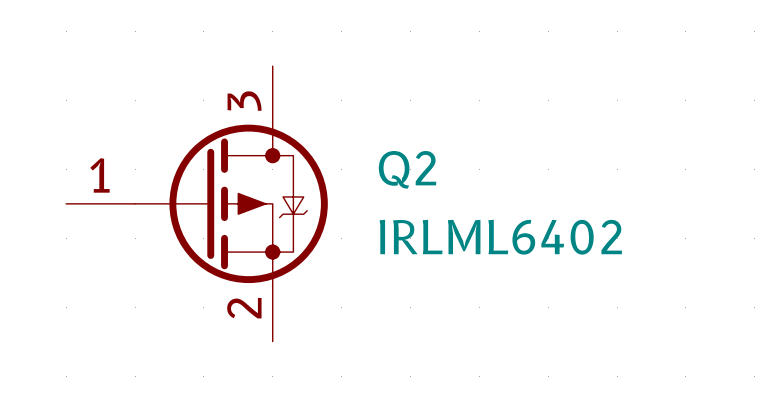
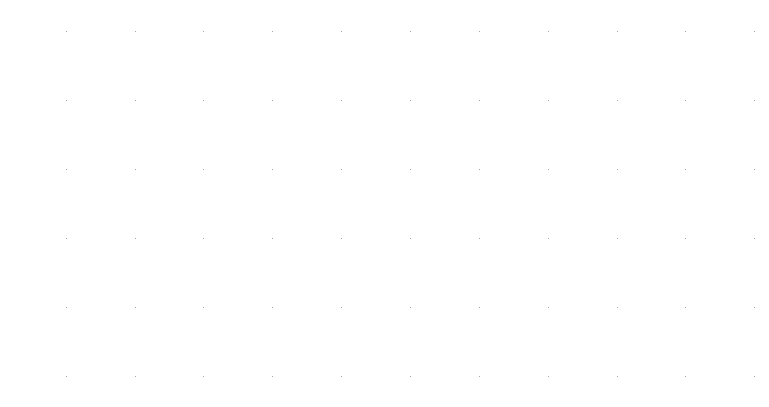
Q2: IRLML6402 (196, 203) -> none

